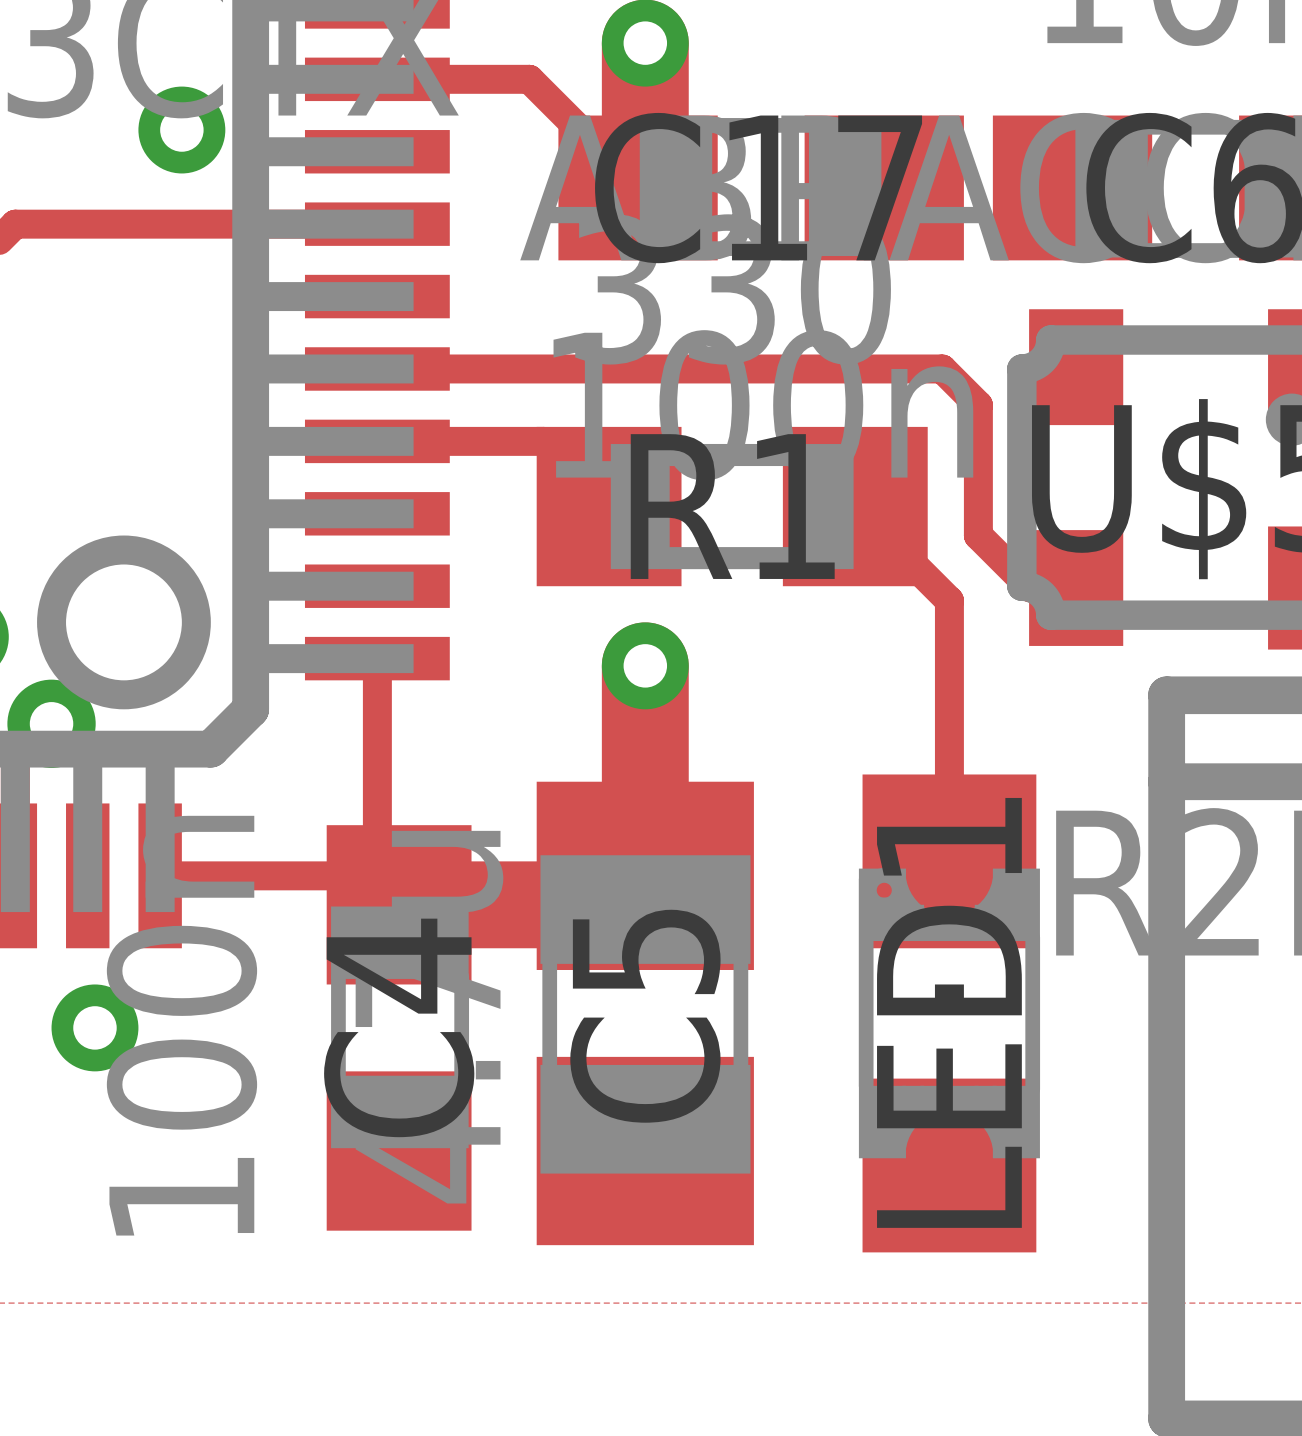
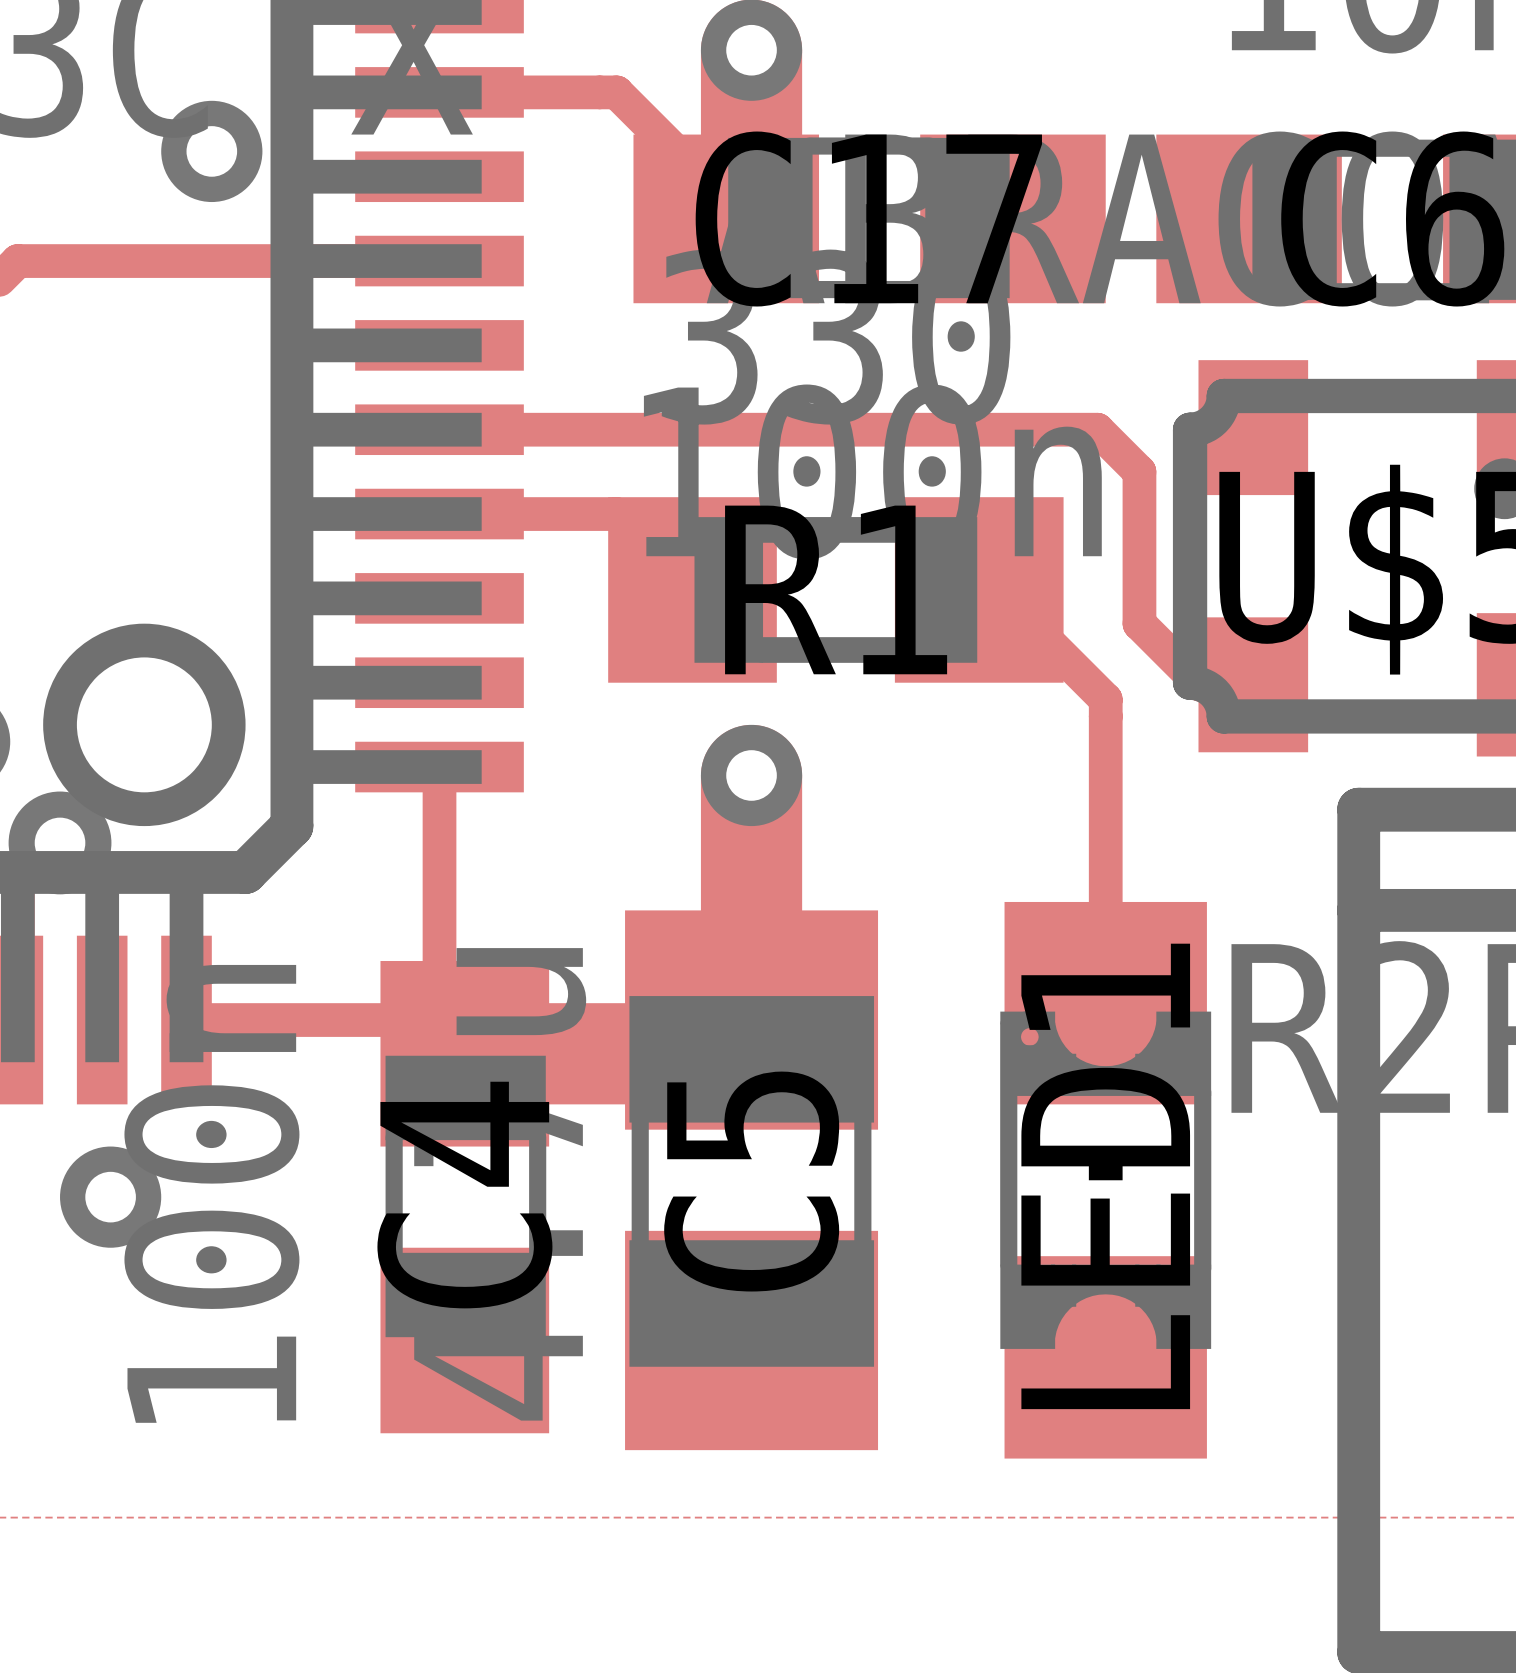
C17 position: (761, 187) -> (869, 218)
R1 position: (732, 506) -> (835, 589)

